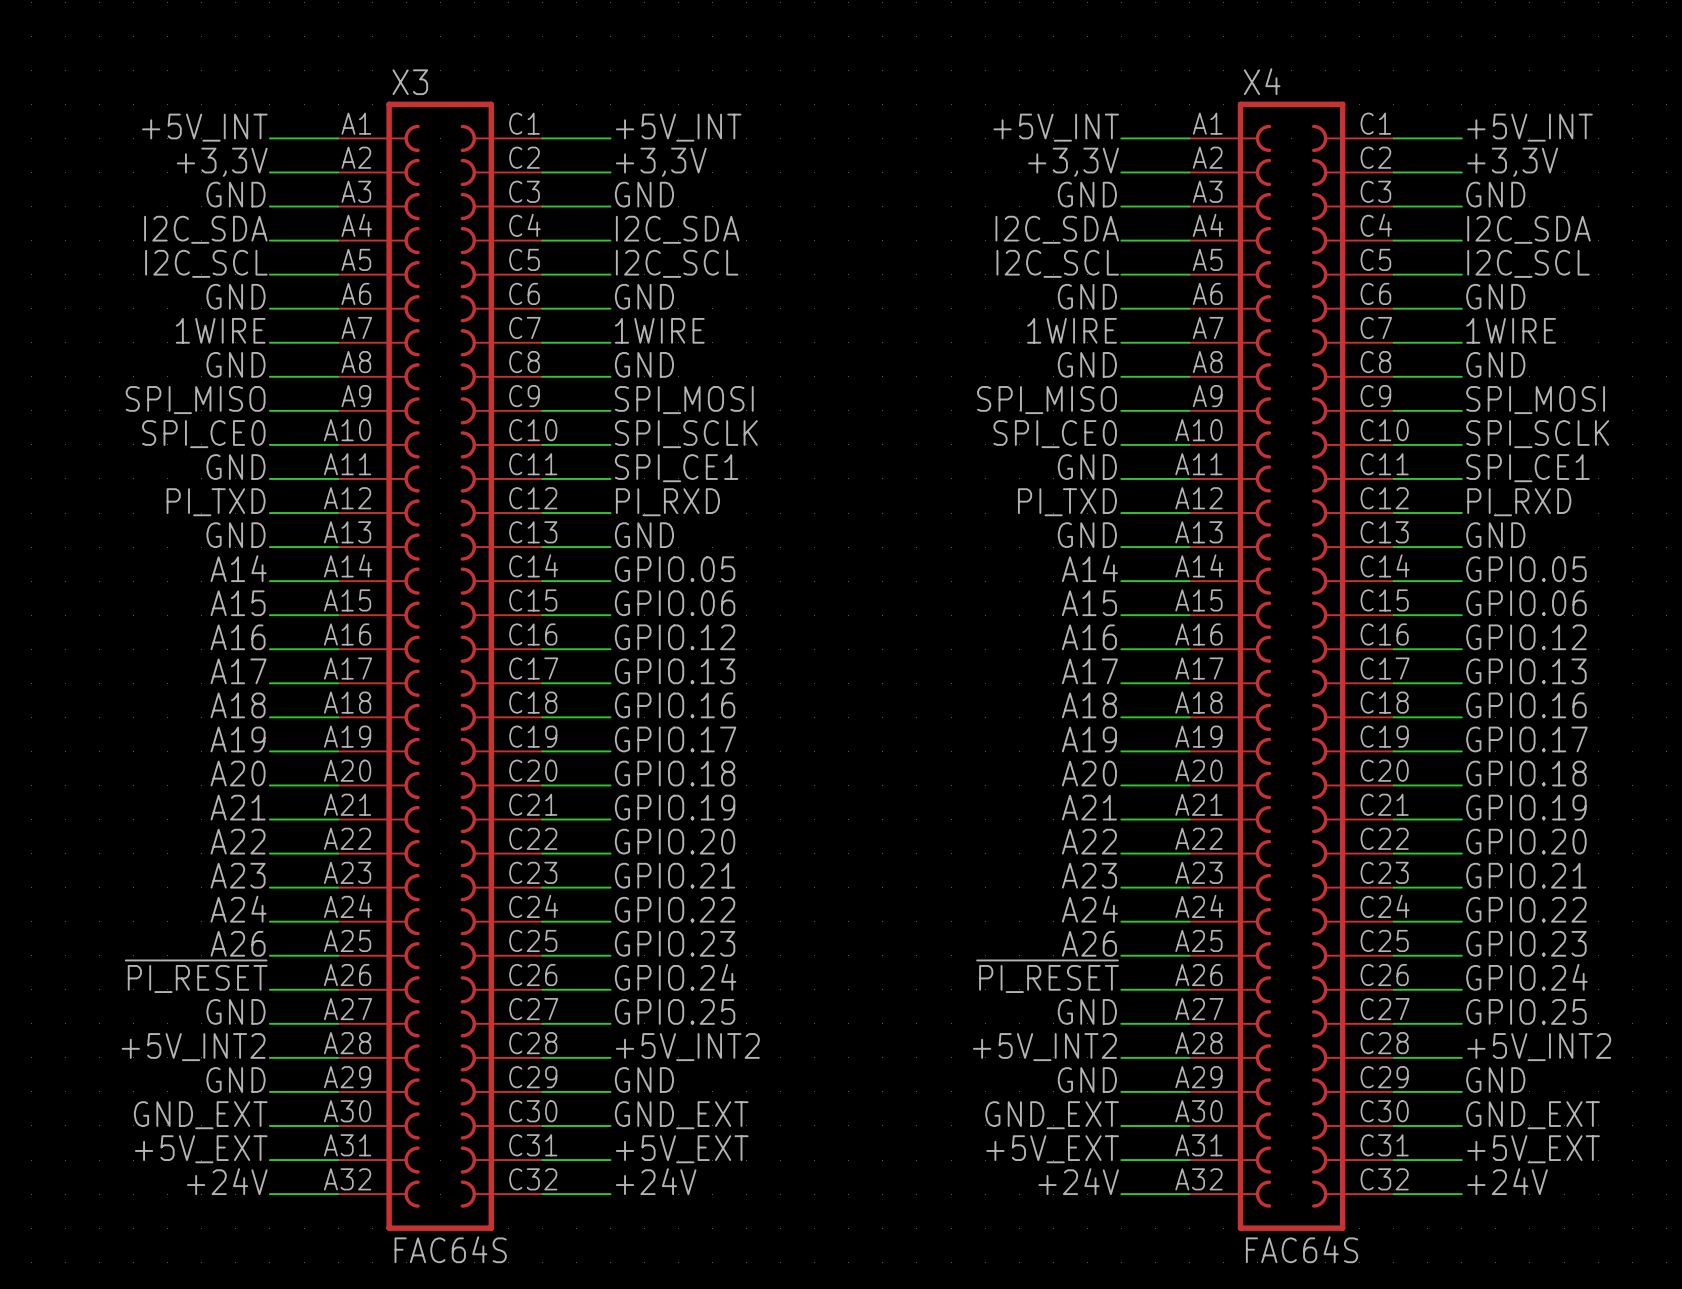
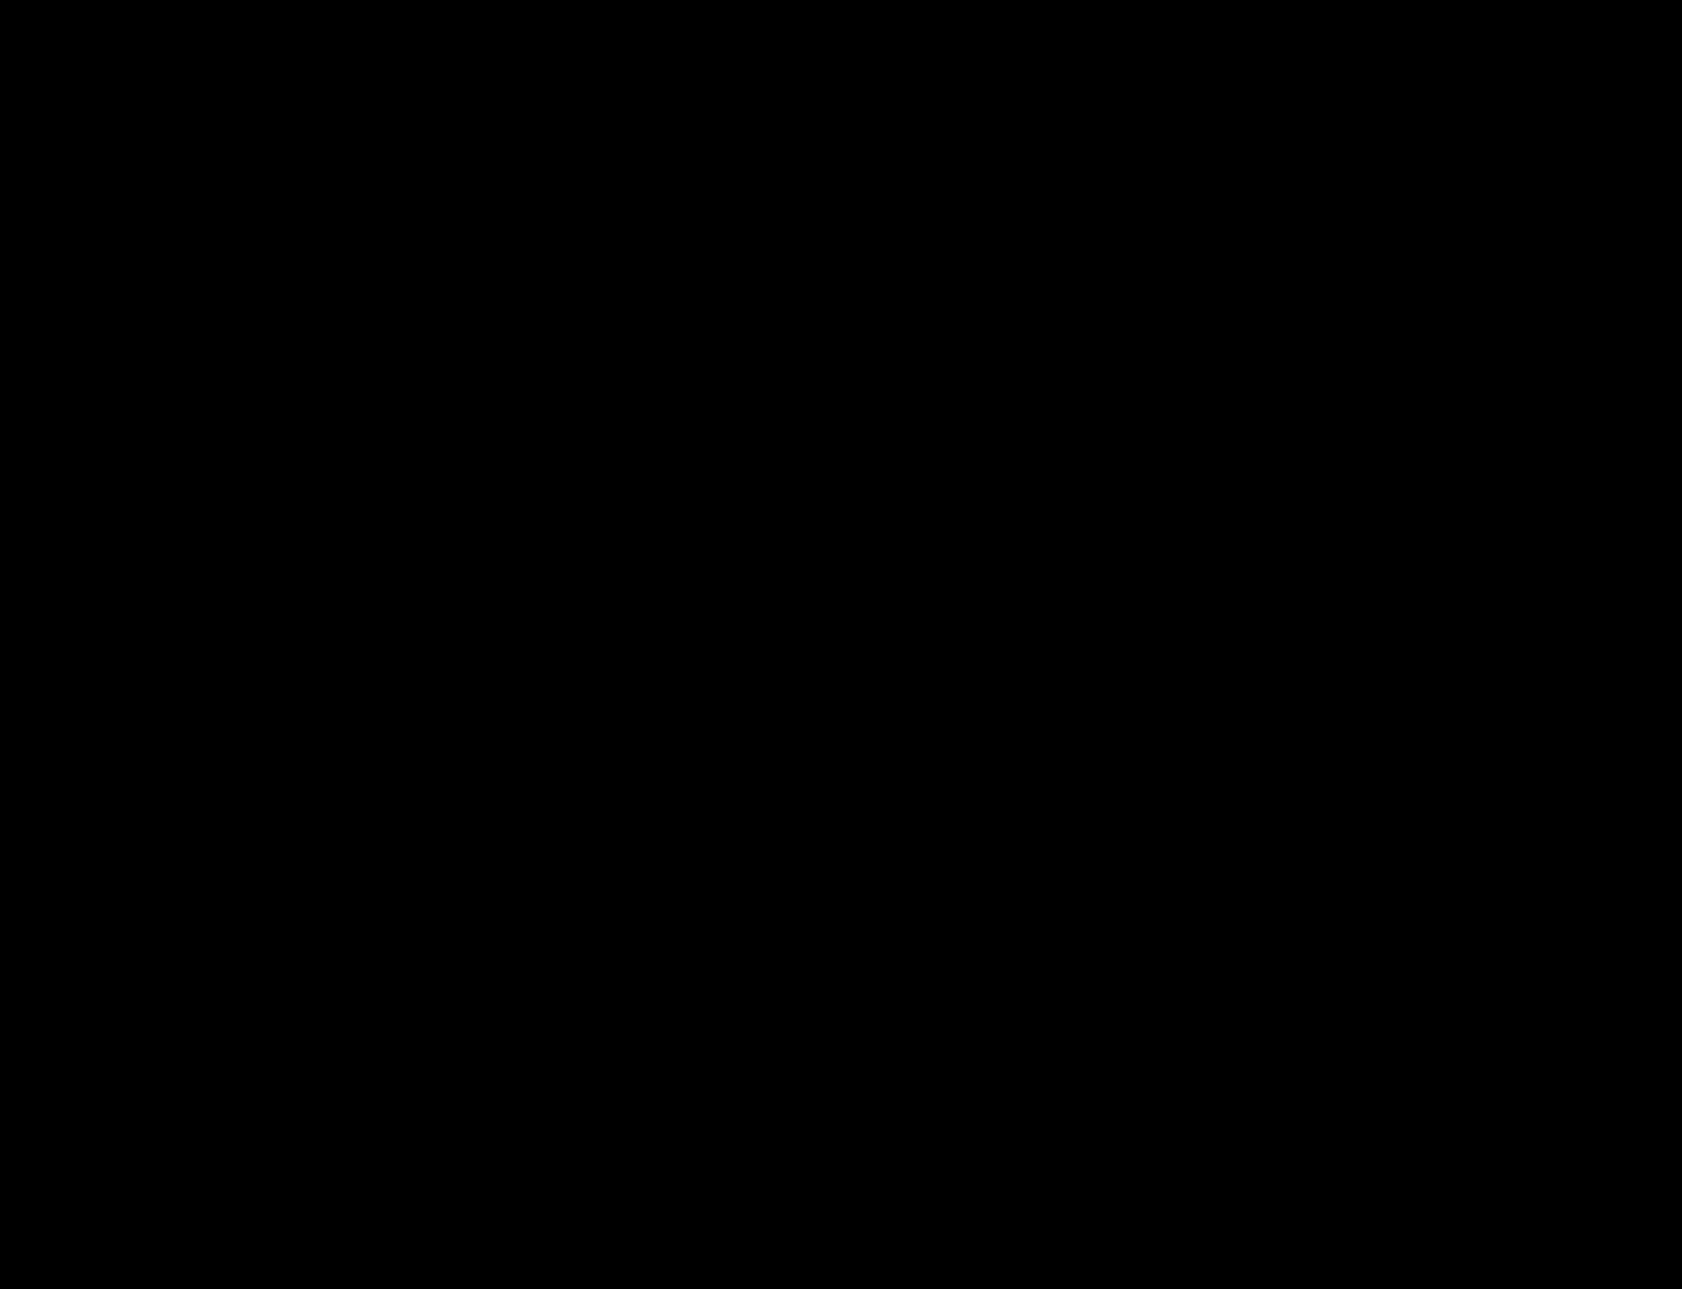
label: +5V_INT (204, 127) -> none
label: +5V_INT (678, 127) -> none
label: +5V_INT (1056, 127) -> none
label: +5V_INT (1530, 127) -> none
wire: (269, 138) (338, 138) -> none
wire: (542, 138) (610, 138) -> none
wire: (1121, 138) (1189, 138) -> none
wire: (1393, 138) (1461, 138) -> none
label: +3,3V (222, 162) -> none
label: +3,3V (661, 162) -> none
label: +3,3V (1073, 162) -> none
label: +3,3V (1512, 162) -> none
wire: (269, 172) (338, 172) -> none
wire: (542, 172) (610, 172) -> none
wire: (1121, 172) (1189, 172) -> none
wire: (1393, 172) (1461, 172) -> none
label: GND (235, 194) -> none
label: GND (644, 194) -> none
label: GND (1087, 194) -> none
label: GND (1495, 194) -> none
wire: (269, 206) (338, 206) -> none
wire: (542, 206) (610, 206) -> none
wire: (1121, 206) (1189, 206) -> none
wire: (1393, 206) (1461, 206) -> none
label: I2C_SDA (205, 229) -> none
label: I2C_SDA (677, 229) -> none
label: I2C_SDA (1057, 229) -> none
label: I2C_SDA (1528, 229) -> none
wire: (269, 240) (338, 240) -> none
wire: (542, 240) (610, 240) -> none
wire: (1121, 240) (1189, 240) -> none
wire: (1393, 240) (1461, 240) -> none
label: I2C_SCL (206, 263) -> none
label: I2C_SCL (677, 263) -> none
label: I2C_SCL (1057, 263) -> none
label: I2C_SCL (1528, 263) -> none
wire: (269, 274) (338, 274) -> none
wire: (542, 274) (610, 274) -> none
wire: (1121, 274) (1189, 274) -> none
wire: (1393, 274) (1461, 274) -> none
label: GND (235, 296) -> none
label: GND (644, 296) -> none
label: GND (1087, 296) -> none
label: GND (1495, 296) -> none
wire: (269, 308) (338, 308) -> none
wire: (542, 308) (610, 308) -> none
wire: (1121, 308) (1189, 308) -> none
wire: (1393, 308) (1461, 308) -> none
label: 1WIRE (220, 330) -> none
label: 1WIRE (659, 330) -> none
label: 1WIRE (1072, 330) -> none
label: 1WIRE (1511, 330) -> none
wire: (269, 342) (338, 342) -> none
wire: (542, 342) (610, 342) -> none
wire: (1121, 342) (1189, 342) -> none
wire: (1393, 342) (1461, 342) -> none
label: GND (235, 364) -> none
label: GND (644, 364) -> none
label: GND (1087, 364) -> none
label: GND (1495, 364) -> none
wire: (269, 376) (338, 376) -> none
wire: (542, 376) (610, 376) -> none
wire: (1121, 376) (1189, 376) -> none
wire: (1393, 376) (1461, 376) -> none
label: SPI_MISO (195, 400) -> none
label: SPI_MOSI (684, 400) -> none
label: SPI_MISO (1047, 400) -> none
label: SPI_MOSI (1535, 400) -> none
wire: (269, 410) (338, 410) -> none
wire: (542, 410) (610, 410) -> none
wire: (1121, 410) (1189, 410) -> none
wire: (1393, 410) (1461, 410) -> none
label: SPI_CE0 (203, 434) -> none
label: SPI_SCLK (686, 434) -> none
label: SPI_CE0 (1055, 434) -> none
label: SPI_SCLK (1537, 434) -> none
wire: (269, 444) (338, 444) -> none
wire: (542, 444) (610, 444) -> none
wire: (1121, 444) (1189, 444) -> none
wire: (1393, 444) (1461, 444) -> none
label: GND (235, 467) -> none
label: GND (1087, 467) -> none
label: SPI_CE1 (676, 468) -> none
label: SPI_CE1 (1527, 468) -> none
wire: (269, 478) (338, 478) -> none
wire: (542, 478) (610, 478) -> none
wire: (1121, 478) (1189, 478) -> none
wire: (1393, 478) (1461, 478) -> none
label: PI_TXD (216, 502) -> none
label: PI_RXD (667, 502) -> none
label: PI_TXD (1067, 502) -> none
label: PI_RXD (1519, 502) -> none
wire: (269, 513) (338, 513) -> none
wire: (542, 513) (610, 513) -> none
wire: (1121, 513) (1189, 513) -> none
wire: (1393, 513) (1461, 513) -> none
label: GND (235, 535) -> none
label: GND (644, 535) -> none
label: GND (1087, 535) -> none
label: GND (1495, 535) -> none
wire: (269, 547) (338, 547) -> none
wire: (542, 547) (610, 547) -> none
wire: (1121, 547) (1189, 547) -> none
wire: (1393, 547) (1461, 547) -> none
label: A14 (238, 568) -> none
label: A14 (1089, 568) -> none
label: GPIO.05 (675, 569) -> none
label: GPIO.05 (1526, 569) -> none
wire: (269, 581) (338, 581) -> none
wire: (542, 581) (610, 581) -> none
wire: (1121, 581) (1189, 581) -> none
wire: (1393, 581) (1461, 581) -> none
label: A15 (238, 603) -> none
label: GPIO.06 (675, 603) -> none
label: A15 (1089, 603) -> none
label: GPIO.06 (1526, 603) -> none
wire: (269, 615) (338, 615) -> none
wire: (542, 615) (610, 615) -> none
wire: (1121, 615) (1189, 615) -> none
wire: (1393, 615) (1461, 615) -> none
label: A16 (238, 637) -> none
label: GPIO.12 (675, 637) -> none
label: A16 (1089, 637) -> none
label: GPIO.12 (1526, 637) -> none
wire: (269, 649) (338, 649) -> none
wire: (542, 649) (610, 649) -> none
wire: (1121, 649) (1189, 649) -> none
wire: (1393, 649) (1461, 649) -> none
X3: FAC64S (440, 666) -> none
X4: FAC64S (1291, 666) -> none
label: A17 (238, 671) -> none
label: GPIO.13 (675, 671) -> none
label: A17 (1089, 671) -> none
label: GPIO.13 (1526, 671) -> none
wire: (269, 683) (338, 683) -> none
wire: (542, 683) (610, 683) -> none
wire: (1121, 683) (1189, 683) -> none
wire: (1393, 683) (1461, 683) -> none
label: A18 (238, 705) -> none
label: GPIO.16 (675, 705) -> none
label: A18 (1089, 705) -> none
label: GPIO.16 (1526, 705) -> none
wire: (269, 717) (338, 717) -> none
wire: (542, 717) (610, 717) -> none
wire: (1121, 717) (1189, 717) -> none
wire: (1393, 717) (1461, 717) -> none
label: A19 (238, 739) -> none
label: GPIO.17 (675, 739) -> none
label: A19 (1089, 739) -> none
label: GPIO.17 (1526, 739) -> none
wire: (269, 751) (338, 751) -> none
wire: (542, 751) (610, 751) -> none
wire: (1121, 751) (1189, 751) -> none
wire: (1393, 751) (1461, 751) -> none
label: A20 (238, 773) -> none
label: GPIO.18 (675, 773) -> none
label: A20 (1089, 773) -> none
label: GPIO.18 (1526, 773) -> none
wire: (269, 785) (338, 785) -> none
wire: (542, 785) (610, 785) -> none
wire: (1121, 785) (1189, 785) -> none
wire: (1393, 785) (1461, 785) -> none
label: A21 (238, 807) -> none
label: GPIO.19 (675, 807) -> none
label: A21 (1089, 807) -> none
label: GPIO.19 (1526, 807) -> none
wire: (269, 819) (338, 819) -> none
wire: (542, 819) (610, 819) -> none
wire: (1121, 819) (1189, 819) -> none
wire: (1393, 819) (1461, 819) -> none
label: A22 (238, 841) -> none
label: GPIO.20 (675, 841) -> none
label: A22 (1089, 841) -> none
label: GPIO.20 (1526, 841) -> none
wire: (269, 853) (338, 853) -> none
wire: (542, 853) (610, 853) -> none
wire: (1121, 853) (1189, 853) -> none
wire: (1393, 853) (1461, 853) -> none
label: A23 (238, 875) -> none
label: GPIO.21 (675, 875) -> none
label: A23 (1089, 875) -> none
label: GPIO.21 (1526, 875) -> none
wire: (269, 887) (338, 887) -> none
wire: (542, 887) (610, 887) -> none
wire: (1121, 887) (1189, 887) -> none
wire: (1393, 887) (1461, 887) -> none
label: A24 (238, 909) -> none
label: GPIO.22 (675, 909) -> none
label: A24 (1089, 909) -> none
label: GPIO.22 (1526, 909) -> none
wire: (269, 921) (338, 921) -> none
wire: (542, 921) (610, 921) -> none
wire: (1121, 921) (1189, 921) -> none
wire: (1393, 921) (1461, 921) -> none
label: A26 (238, 943) -> none
label: GPIO.23 (675, 943) -> none
label: A26 (1089, 943) -> none
label: GPIO.23 (1526, 943) -> none
wire: (269, 955) (338, 955) -> none
wire: (542, 955) (610, 955) -> none
wire: (1121, 955) (1189, 955) -> none
wire: (1393, 955) (1461, 955) -> none
label: ~{PI_RESET} (196, 976) -> none
label: ~{PI_RESET} (1047, 976) -> none
label: GPIO.24 (675, 977) -> none
label: GPIO.24 (1526, 977) -> none
wire: (269, 989) (338, 989) -> none
wire: (542, 989) (610, 989) -> none
wire: (1121, 989) (1189, 989) -> none
wire: (1393, 989) (1461, 989) -> none
label: GND (235, 1011) -> none
label: GPIO.25 (675, 1011) -> none
label: GND (1087, 1011) -> none
label: GPIO.25 (1526, 1011) -> none
wire: (269, 1023) (338, 1023) -> none
wire: (542, 1023) (610, 1023) -> none
wire: (1121, 1023) (1189, 1023) -> none
wire: (1393, 1023) (1461, 1023) -> none
label: +5V_INT2 (193, 1047) -> none
label: +5V_INT2 (687, 1047) -> none
label: +5V_INT2 (1044, 1047) -> none
label: +5V_INT2 (1539, 1047) -> none
wire: (269, 1057) (338, 1057) -> none
wire: (542, 1057) (610, 1057) -> none
wire: (1121, 1057) (1189, 1057) -> none
wire: (1393, 1057) (1461, 1057) -> none
label: GND (235, 1080) -> none
label: GND (644, 1080) -> none
label: GND (1087, 1080) -> none
label: GND (1495, 1080) -> none
wire: (269, 1091) (338, 1091) -> none
wire: (542, 1091) (610, 1091) -> none
wire: (1121, 1091) (1189, 1091) -> none
wire: (1393, 1091) (1461, 1091) -> none
label: GND_EXT (200, 1115) -> none
label: GND_EXT (681, 1115) -> none
label: GND_EXT (1052, 1115) -> none
label: GND_EXT (1533, 1115) -> none
wire: (269, 1125) (338, 1125) -> none
wire: (542, 1125) (610, 1125) -> none
wire: (1121, 1125) (1189, 1125) -> none
wire: (1393, 1125) (1461, 1125) -> none
label: +5V_EXT (201, 1149) -> none
label: +5V_EXT (682, 1149) -> none
label: +5V_EXT (1052, 1149) -> none
label: +5V_EXT (1533, 1149) -> none
wire: (269, 1160) (338, 1160) -> none
wire: (542, 1160) (610, 1160) -> none
wire: (1121, 1160) (1189, 1160) -> none
wire: (1393, 1160) (1461, 1160) -> none
label: +24V (227, 1181) -> none
label: +24V (656, 1181) -> none
label: +24V (1078, 1181) -> none
label: +24V (1507, 1181) -> none
wire: (269, 1194) (338, 1194) -> none
wire: (542, 1194) (610, 1194) -> none
wire: (1121, 1194) (1189, 1194) -> none
wire: (1393, 1194) (1461, 1194) -> none

